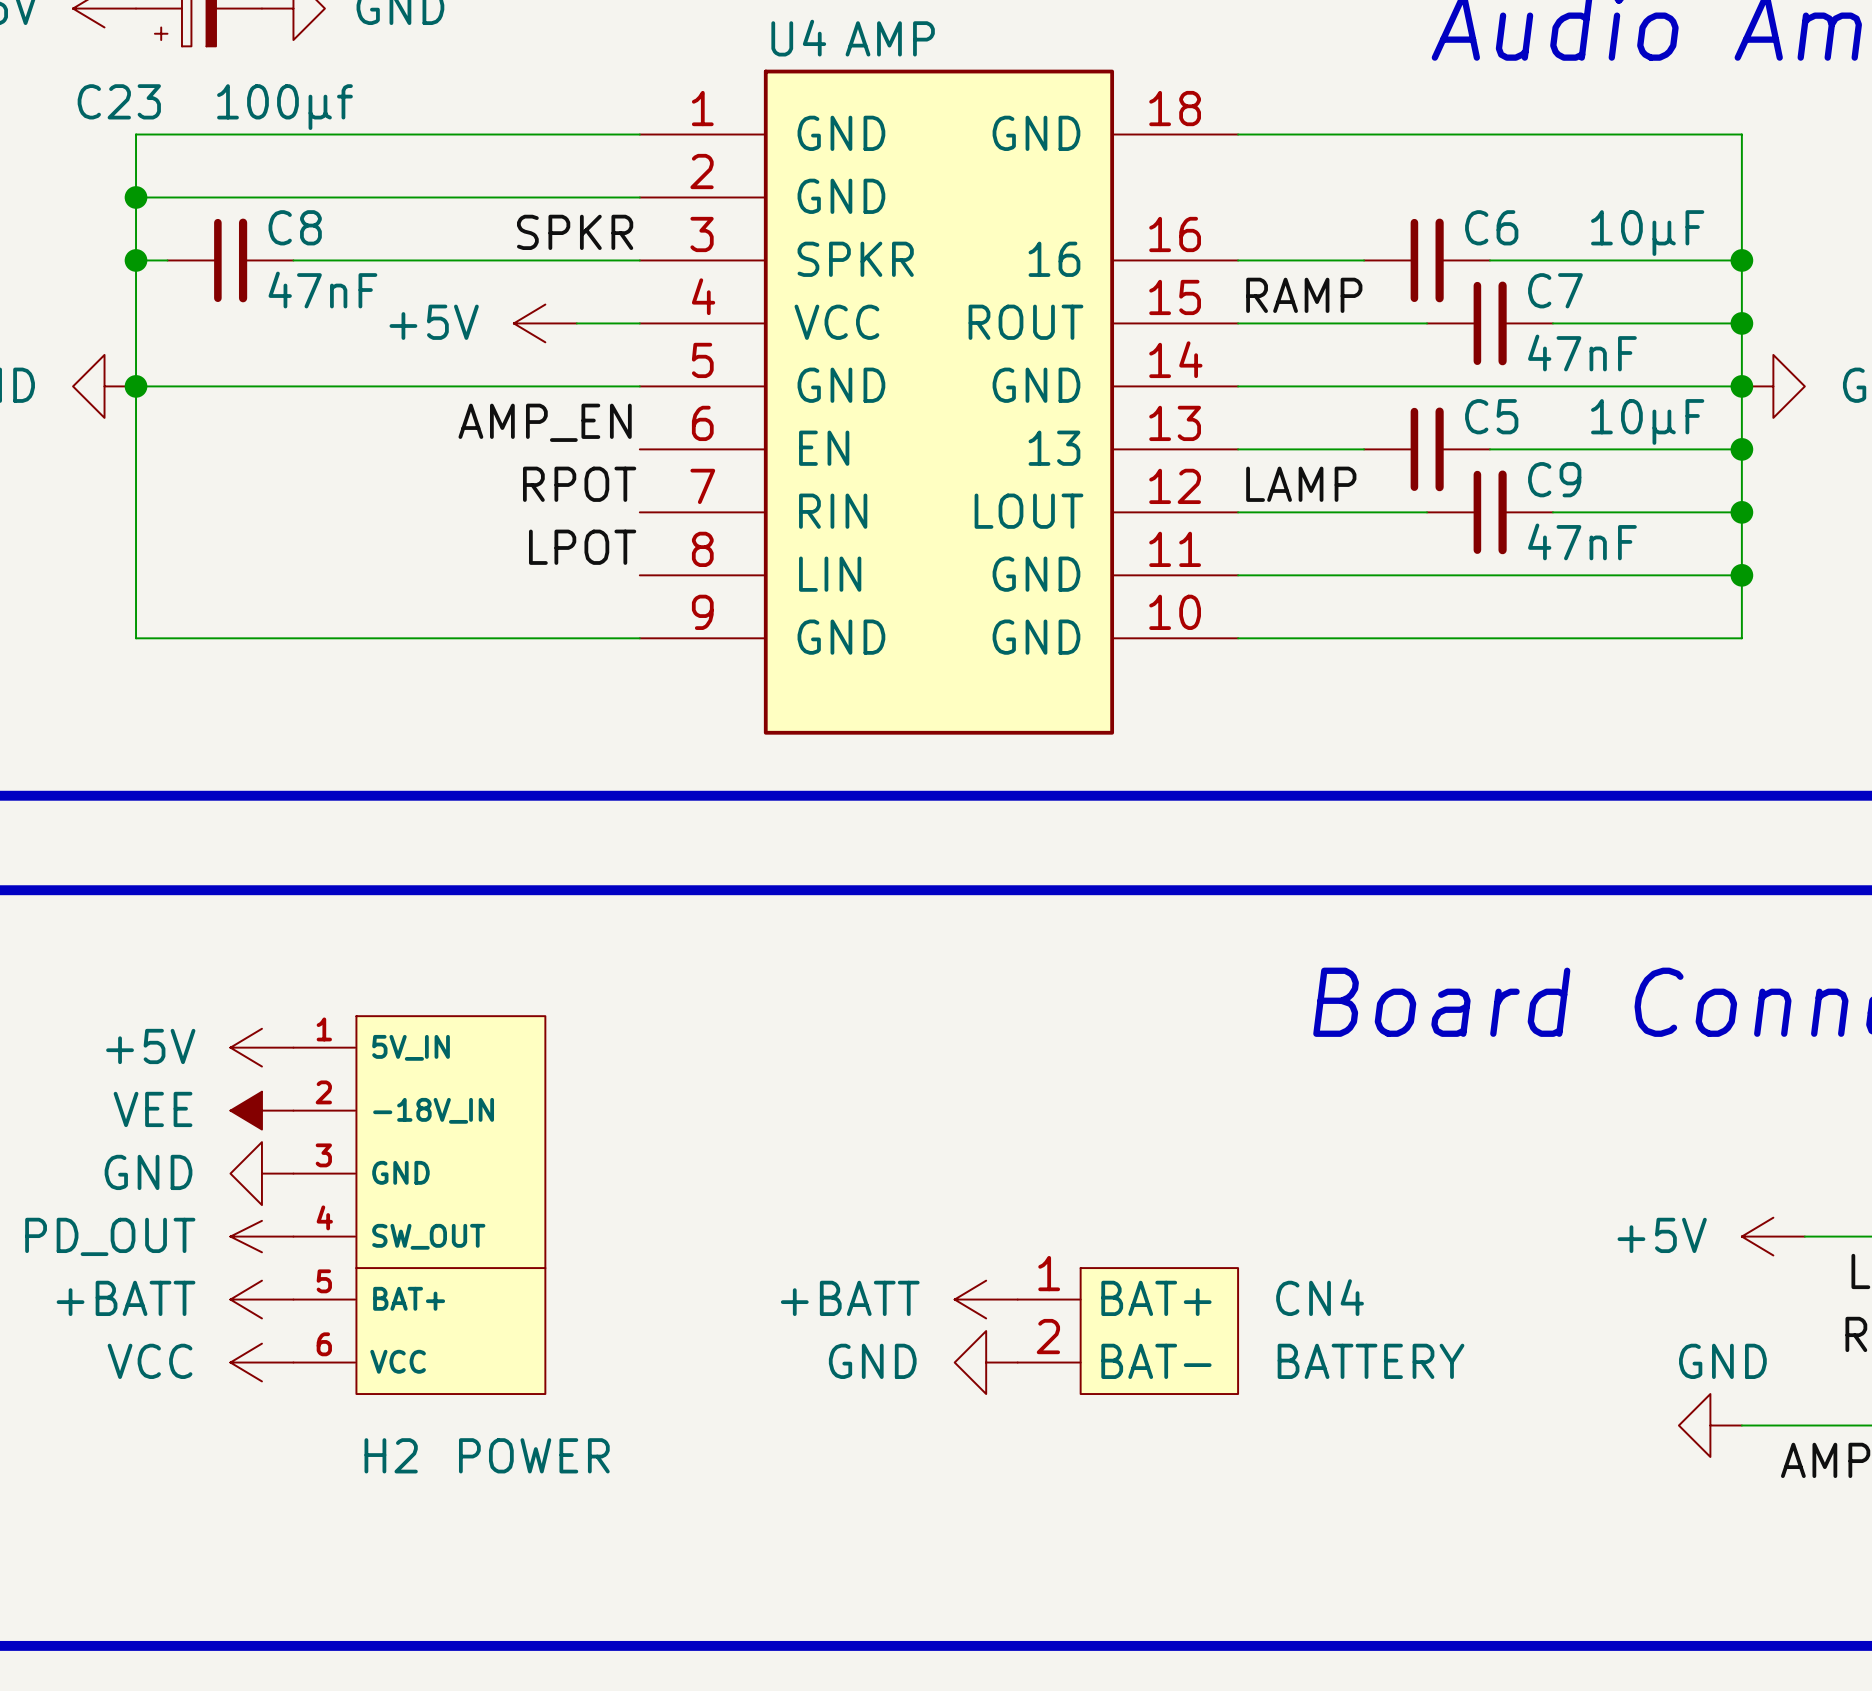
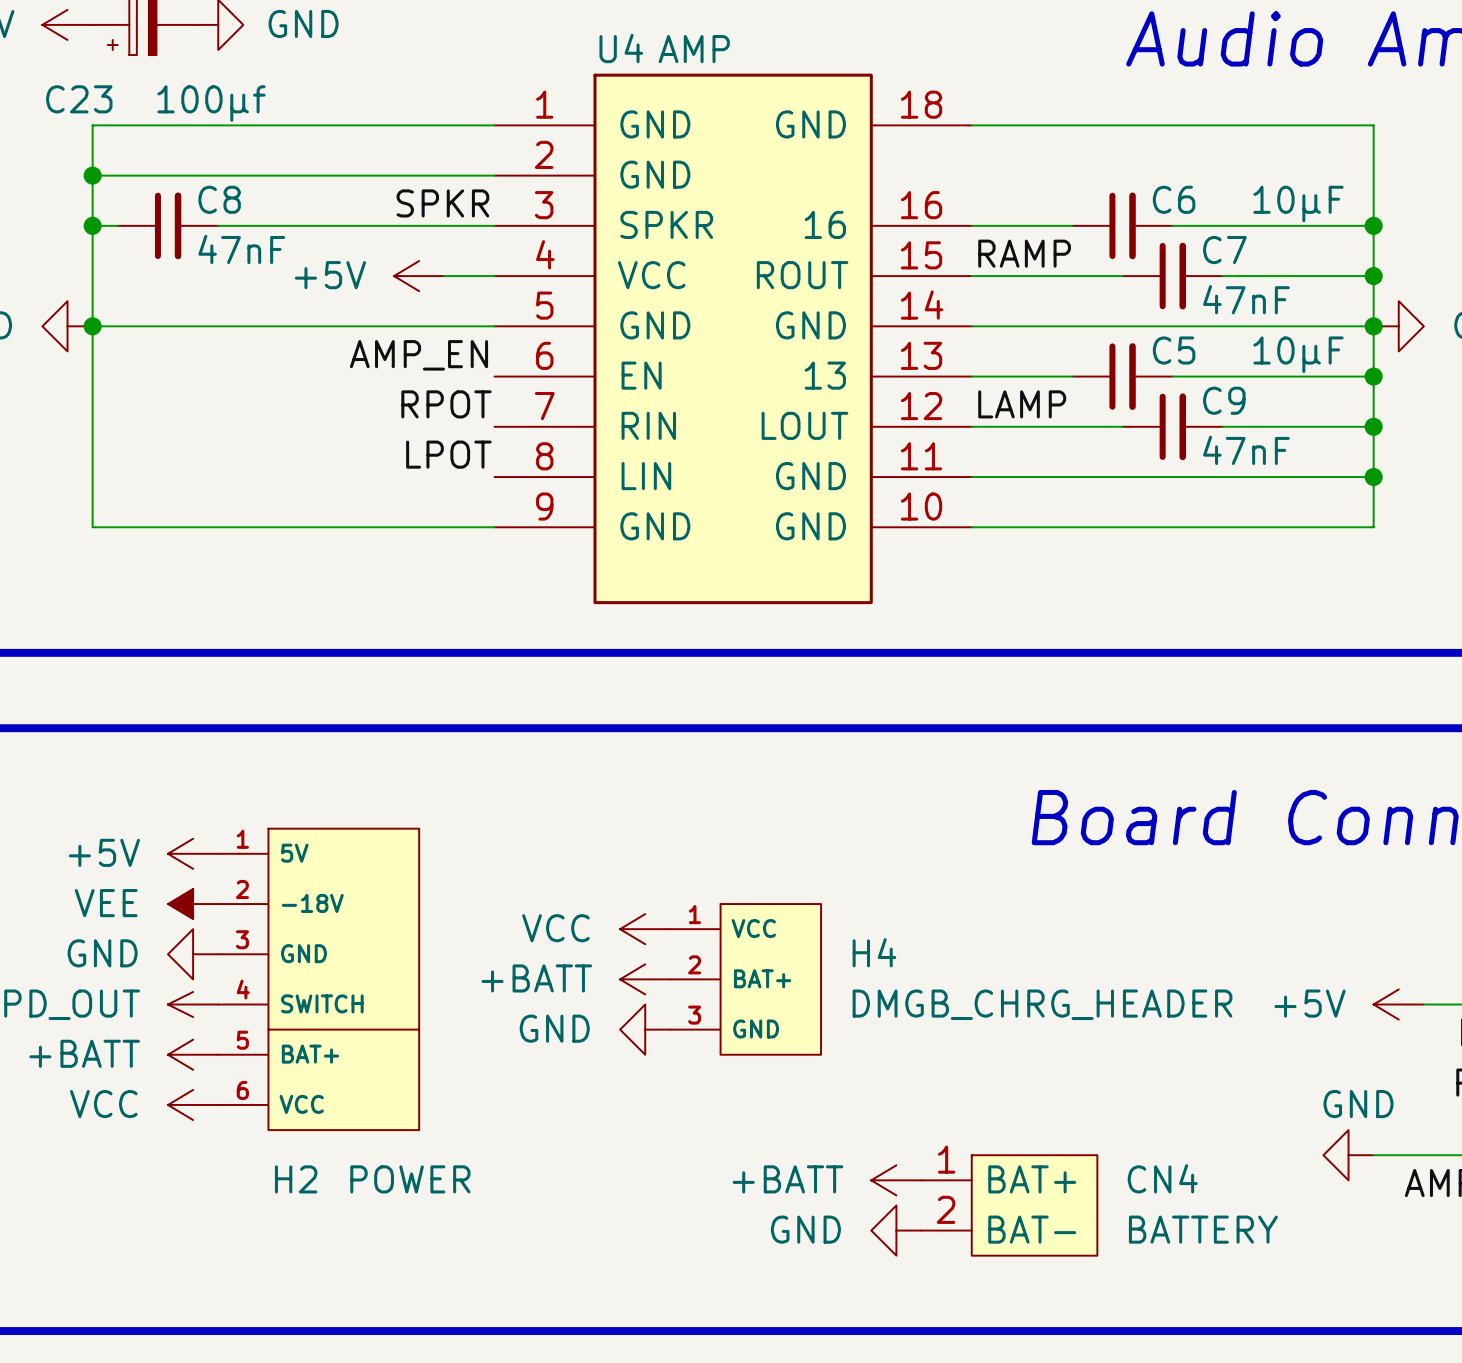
H2 pin name: 5V_IN (411, 1047) -> 5V (294, 853)
H2 pin name: -18V_IN (433, 1110) -> -18V (312, 903)
power symbol: none -> VCC (645, 929)
CN4 position: (1238, 1142) -> (1097, 1054)
power symbol: none -> +BATT (645, 979)
H4: none -> DMGB_CHRG_HEADER (745, 979)
H2 pin name: SW_OUT (428, 1236) -> SWITCH (322, 1003)
power symbol: none -> GND (645, 1029)
power symbol: +BATT (986, 1299) -> none
power symbol: GND (986, 1362) -> none
power symbol: none -> +BATT (896, 1180)
power symbol: none -> GND (896, 1230)

